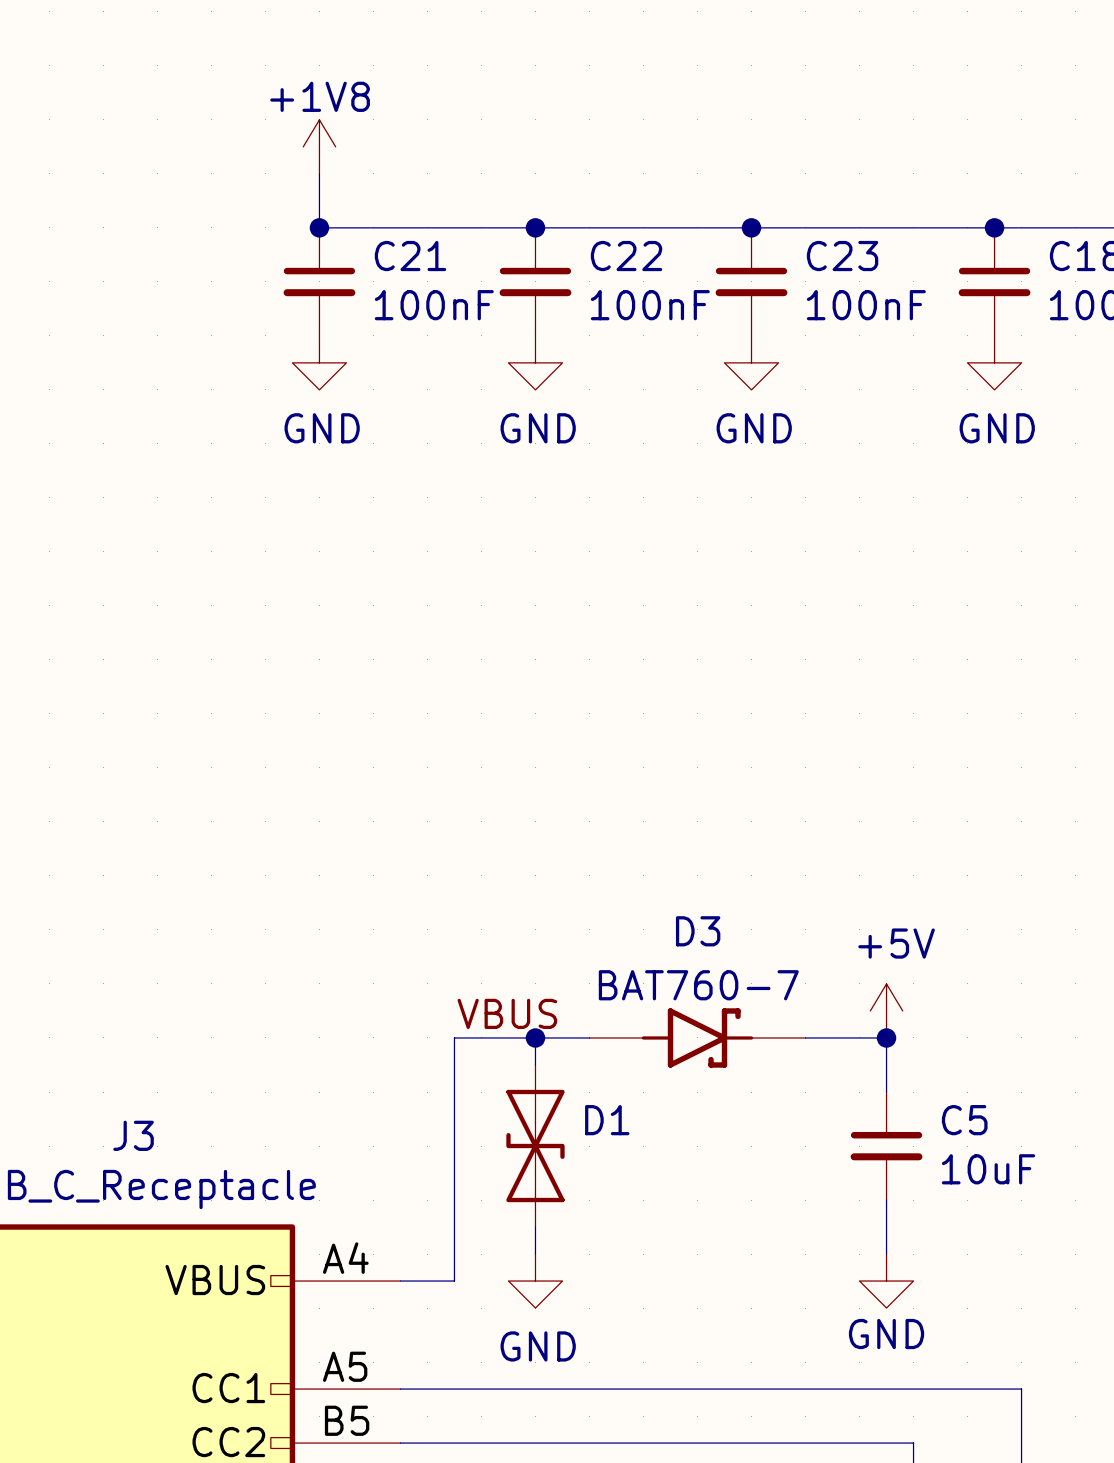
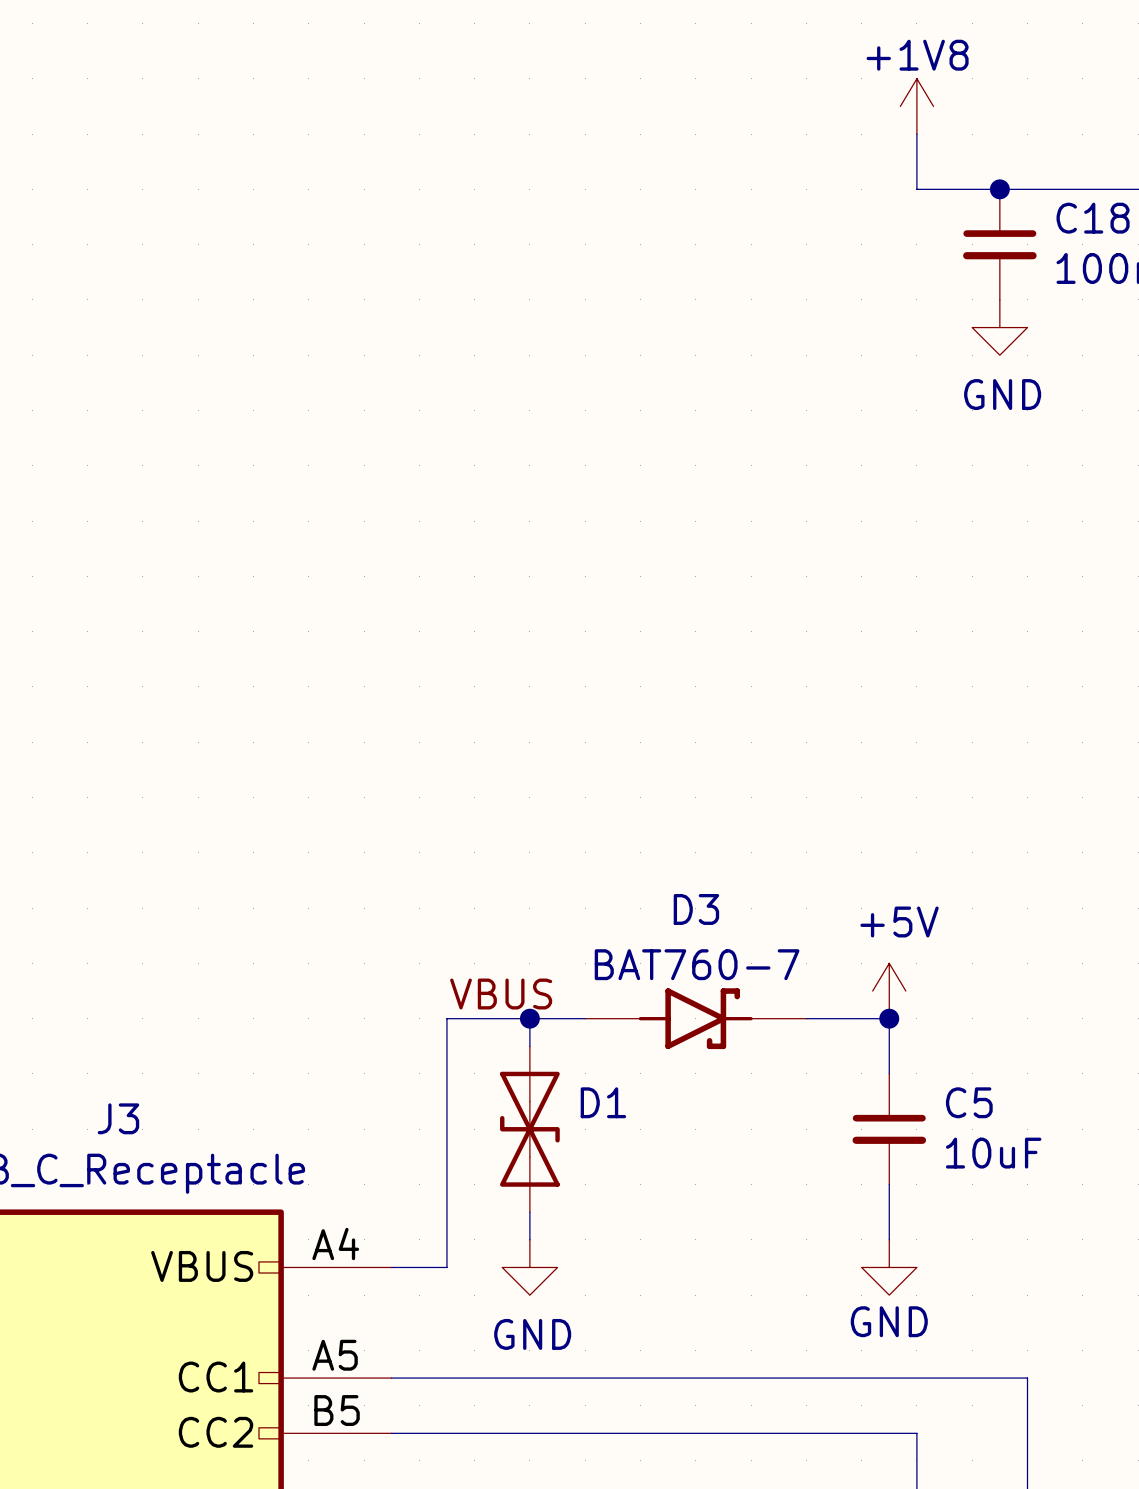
power symbol: +1V8 (319, 146) -> none
power symbol: none -> +1V8 (916, 106)
wire: (319, 173) (319, 227) (913, 227) -> (916, 134) (916, 189)
junction: (319, 227) -> none
junction: (535, 227) -> none
junction: (751, 227) -> none
C21: 100nF (319, 281) -> none
C22: 100nF (535, 281) -> none
C23: 100nF (751, 281) -> none
power symbol: GND (319, 362) -> none
power symbol: GND (535, 362) -> none
power symbol: GND (751, 362) -> none

